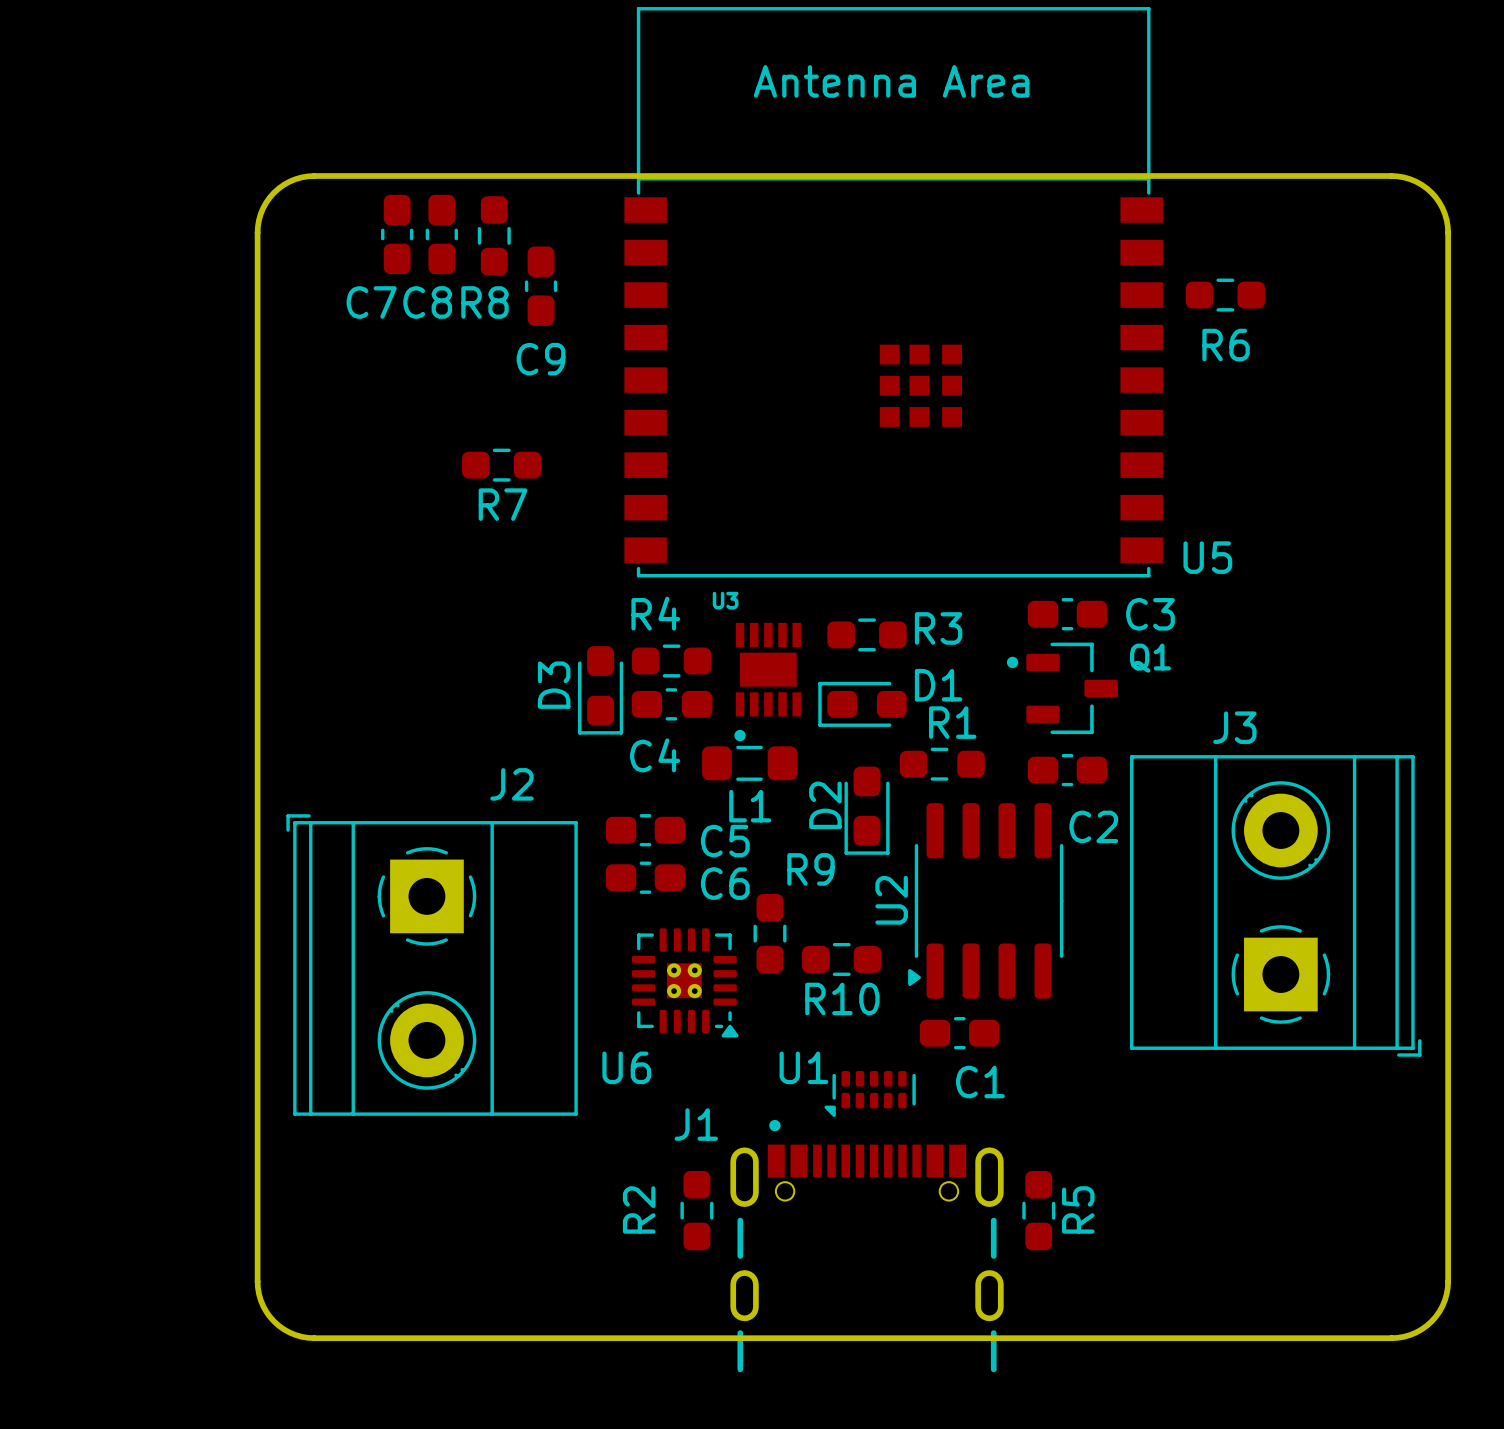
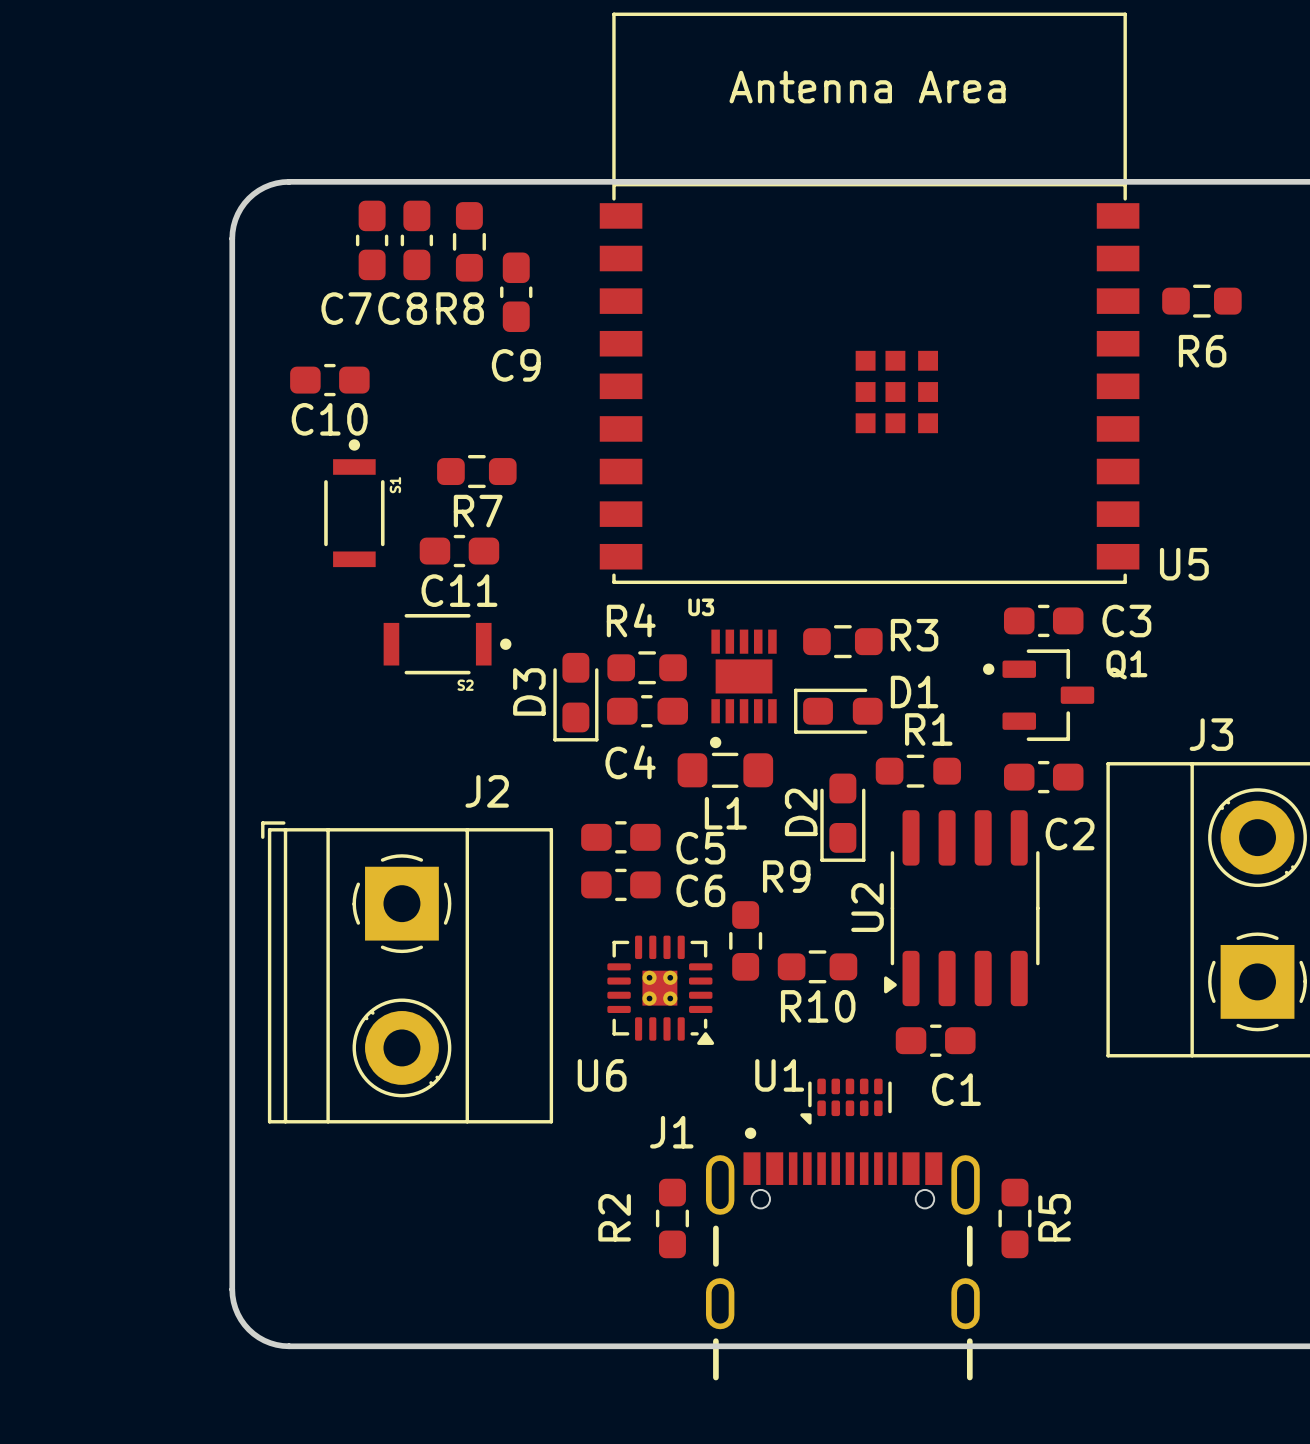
C10: none -> (329, 380)
S1: none -> (354, 503)
C11: none -> (459, 551)
S2: none -> (447, 644)

